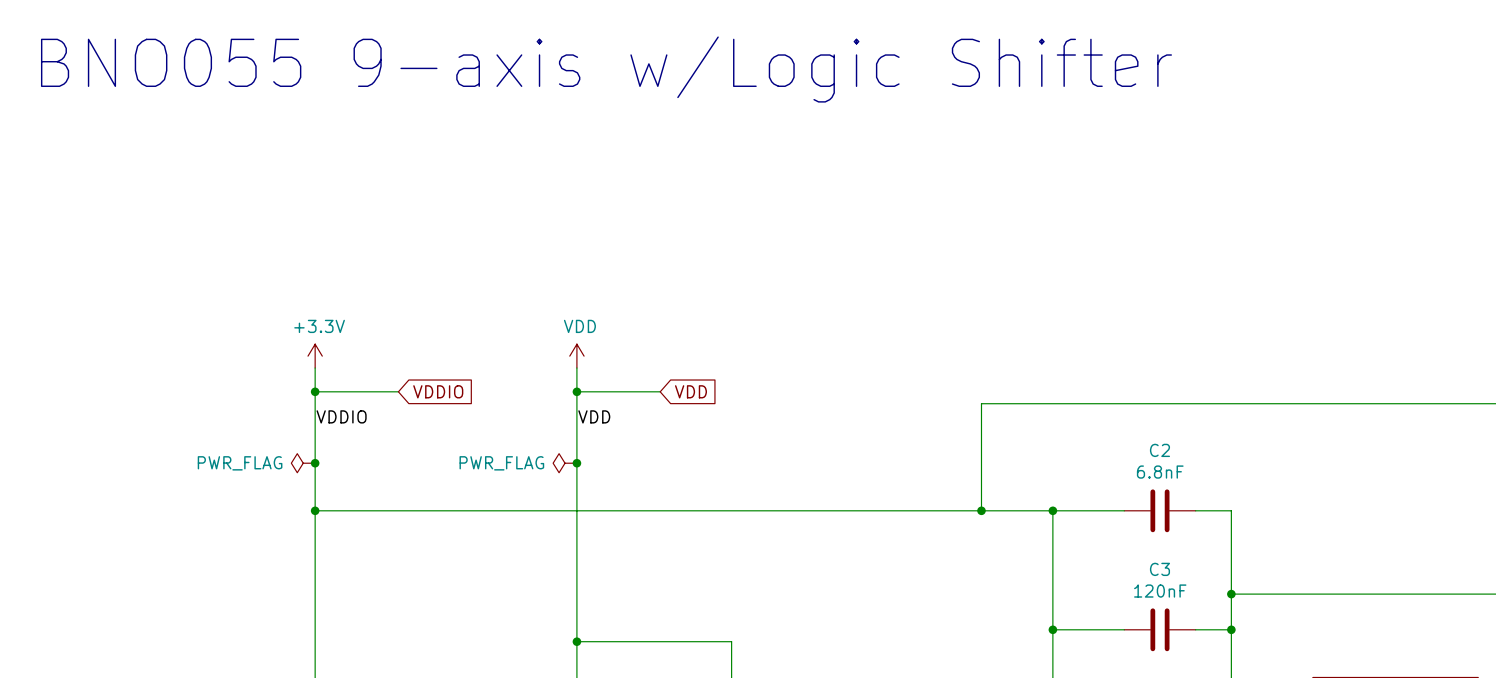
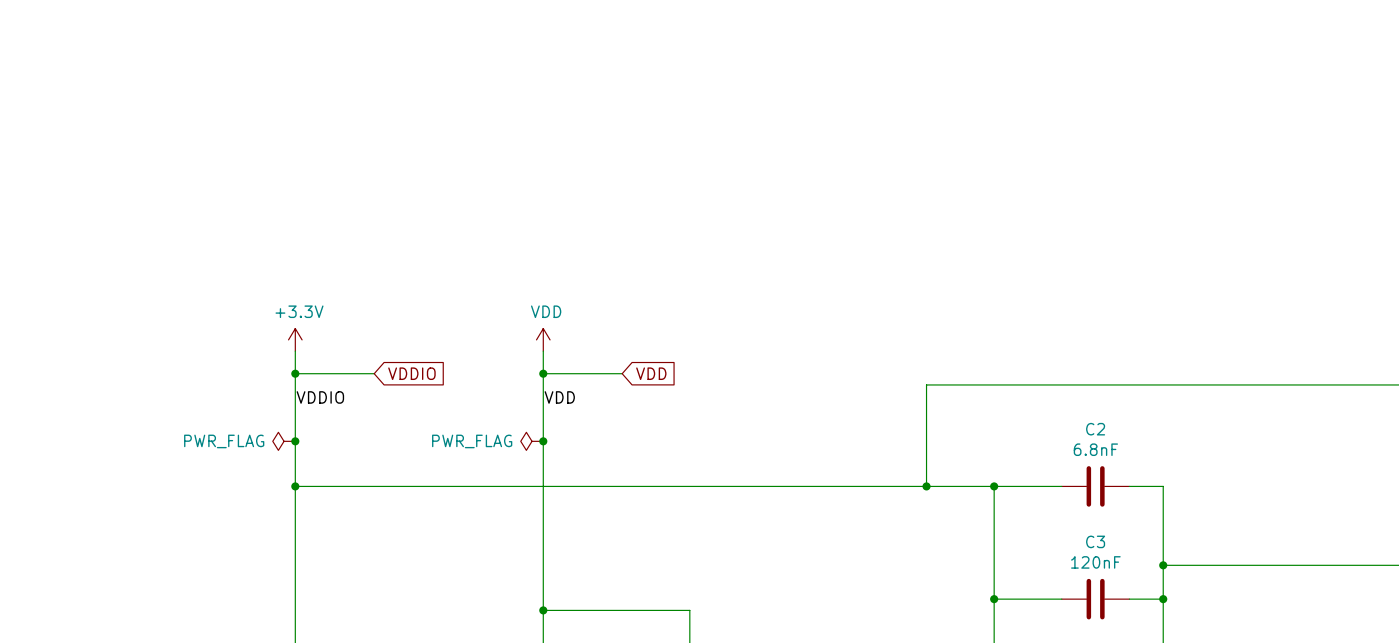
text: BNO055 9-axis w/Logic Shifter (606, 69) -> none

